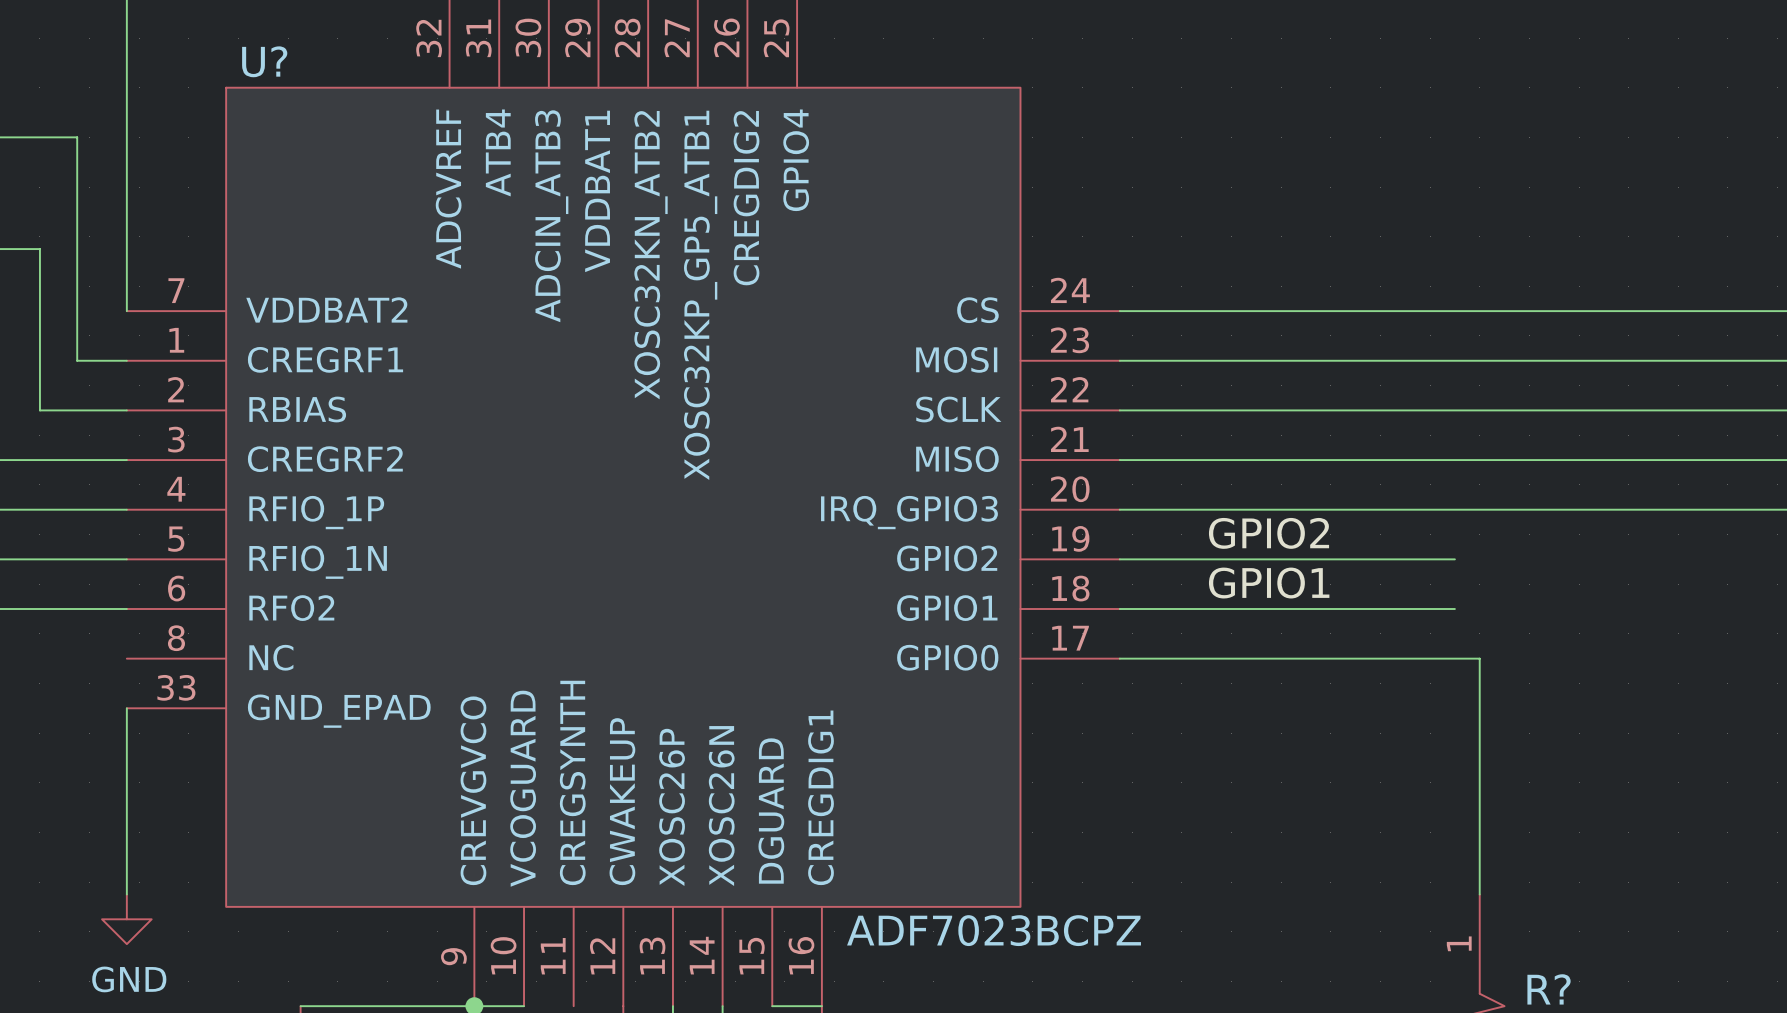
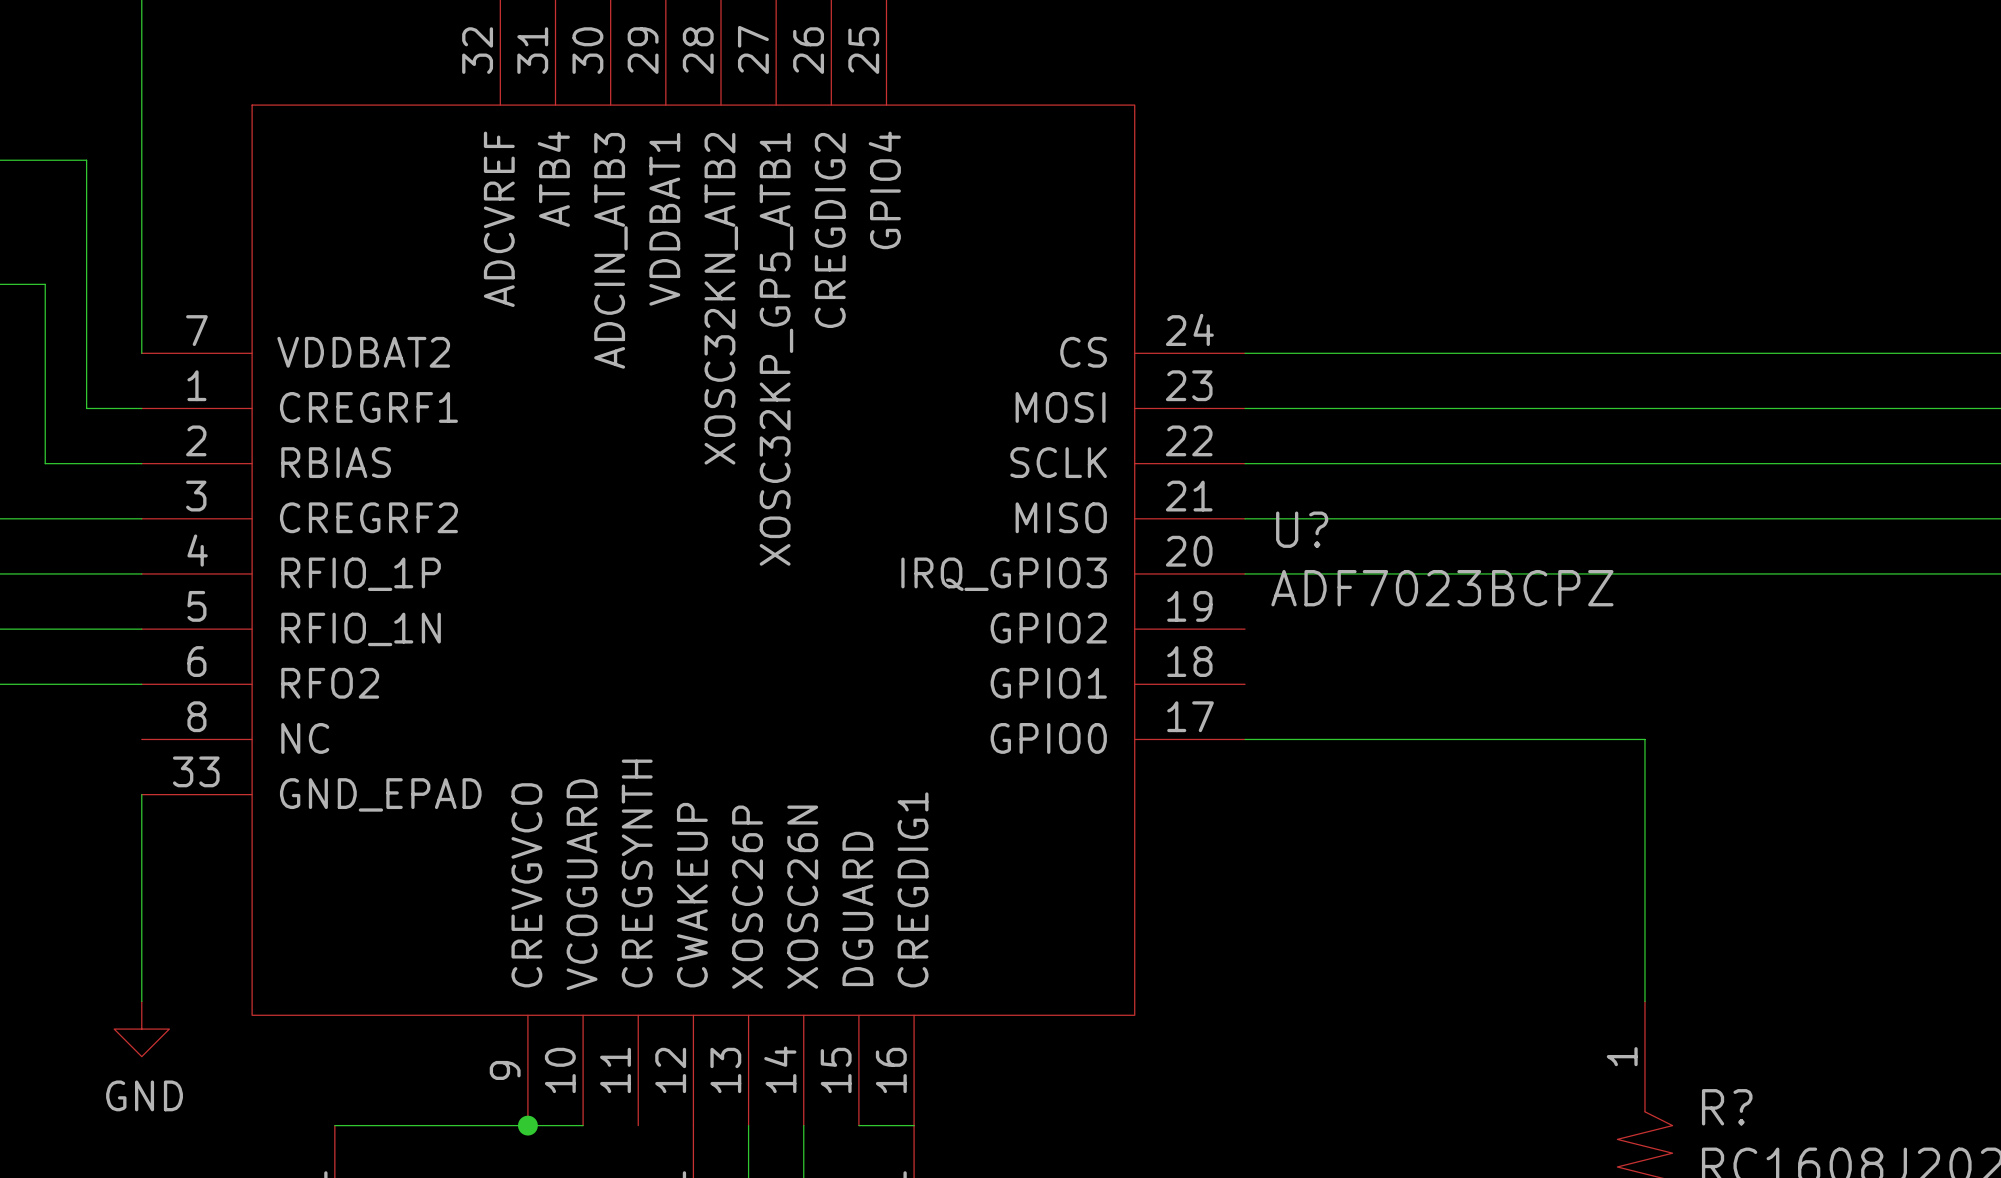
U? name position: U? (264, 61) -> U? (1302, 529)
label: GPIO2 (1269, 533) -> none
wire: (1119, 559) (1454, 559) -> none
label: GPIO1 (1269, 583) -> none
wire: (1119, 609) (1454, 609) -> none
U? value position: ADF7023BCPZ (994, 930) -> ADF7023BCPZ (1442, 588)

